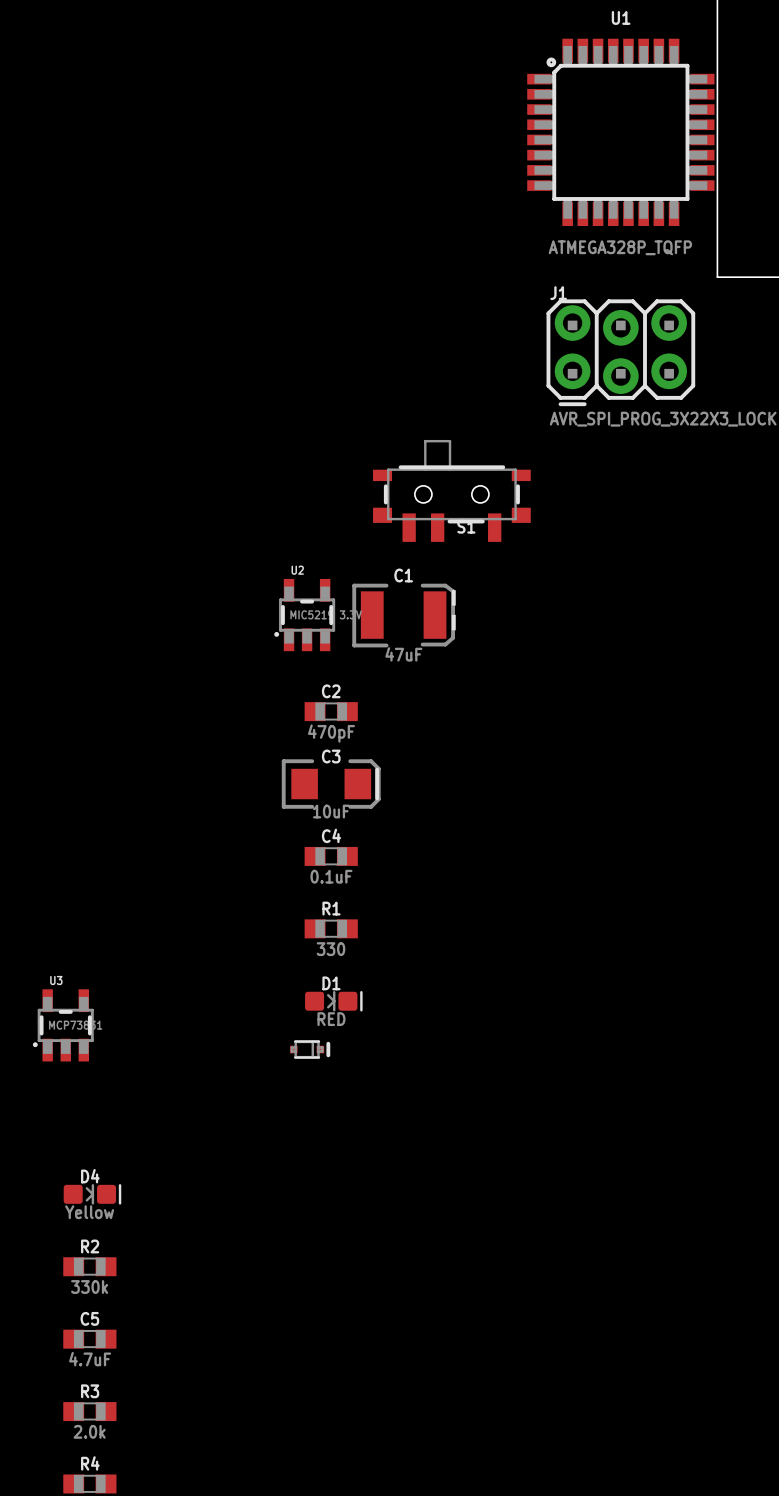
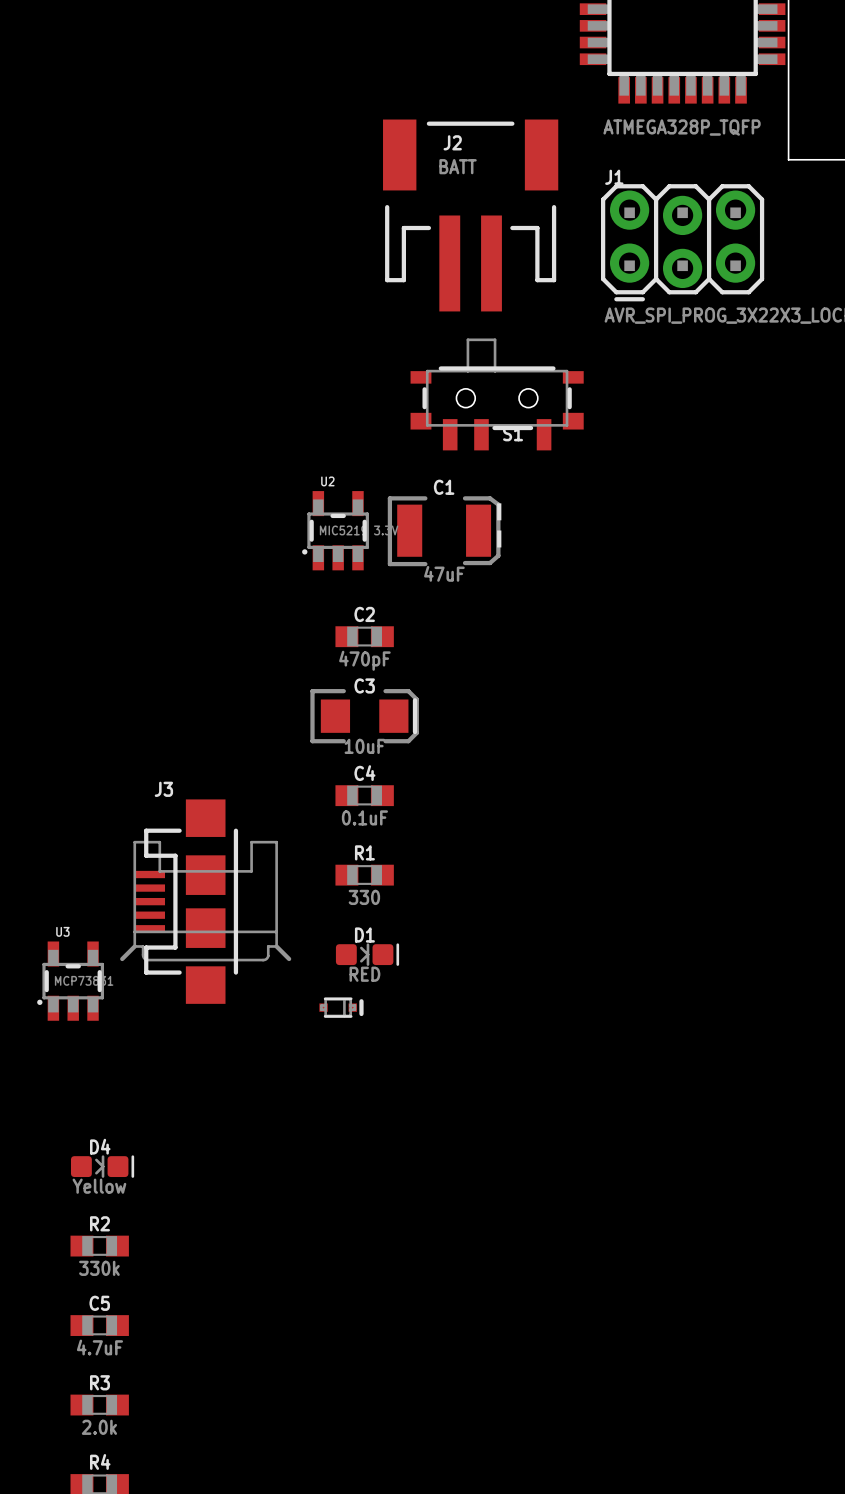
J2: none -> BATT (470, 215)
J3: none -> (205, 901)

